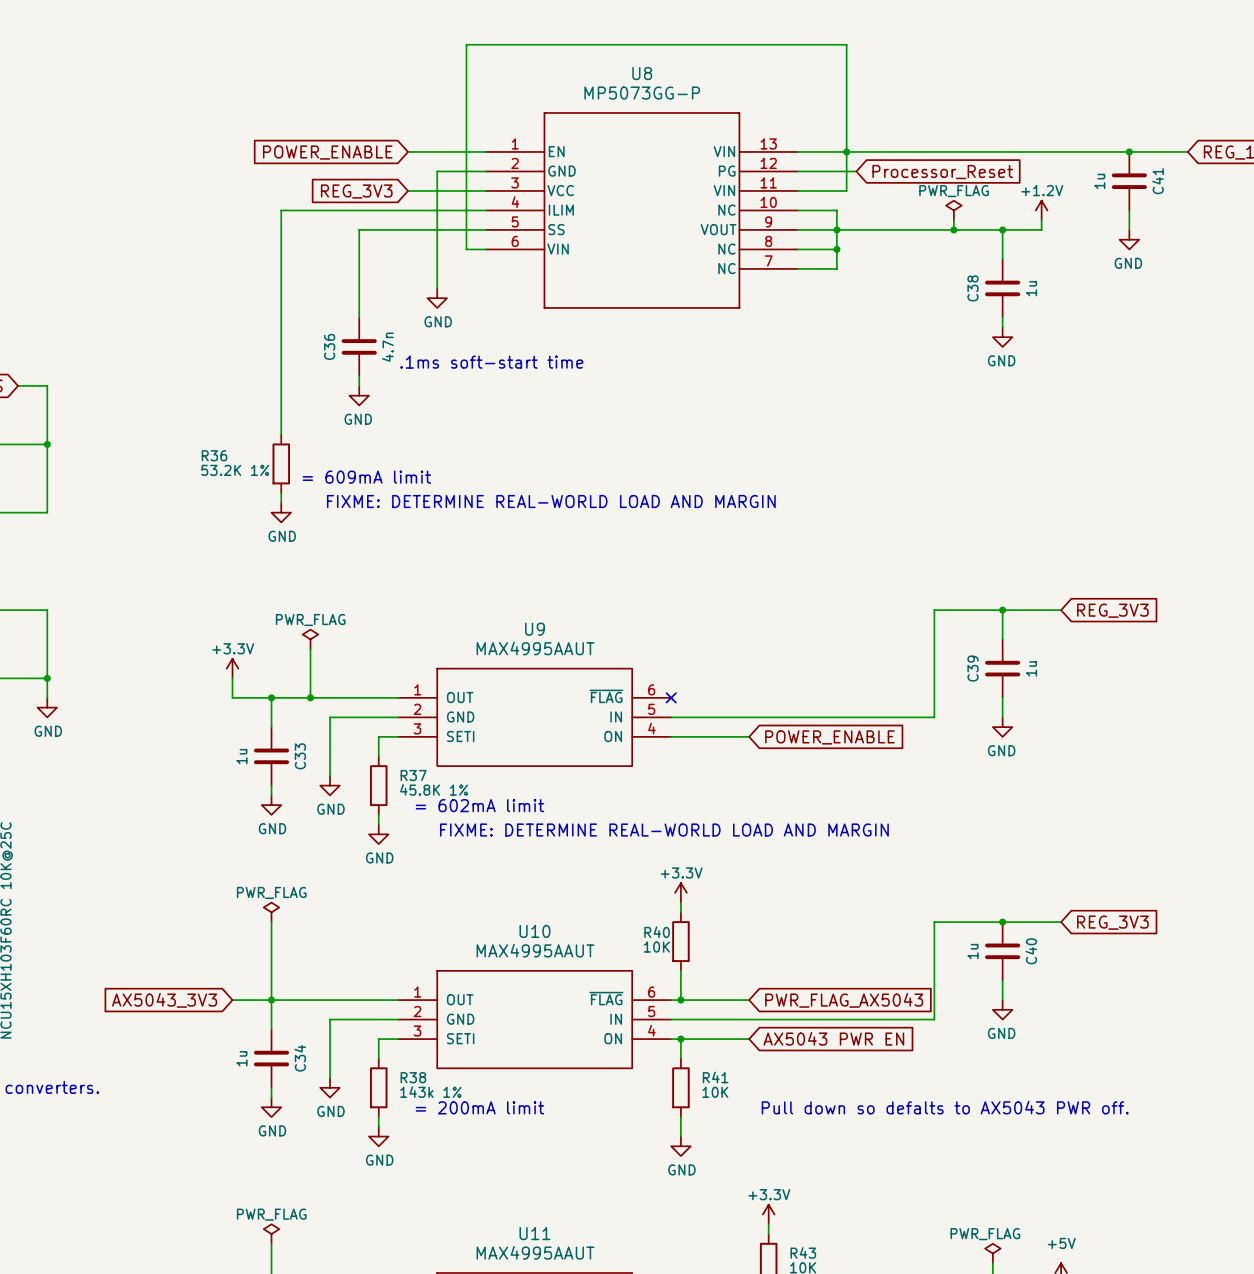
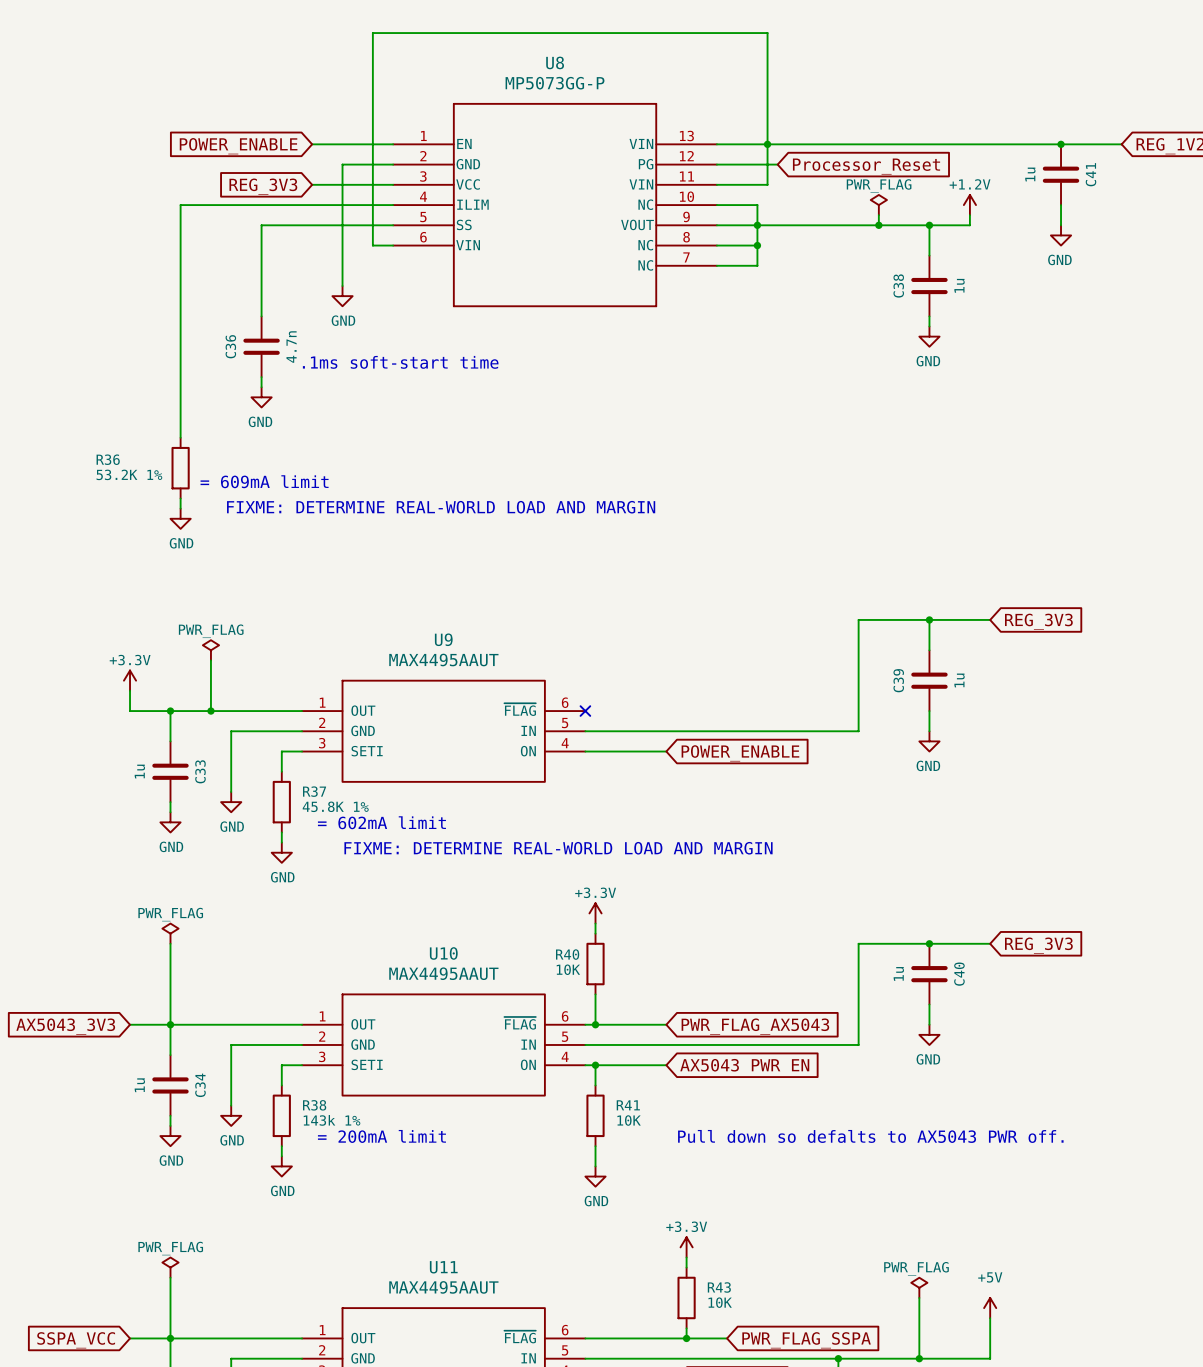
U9 value: MAX4995AAUT (535, 648) -> MAX4495AAUT (443, 660)
U10 value: MAX4995AAUT (535, 950) -> MAX4495AAUT (443, 973)
U11 value: MAX4995AAUT (535, 1252) -> MAX4495AAUT (443, 1287)

